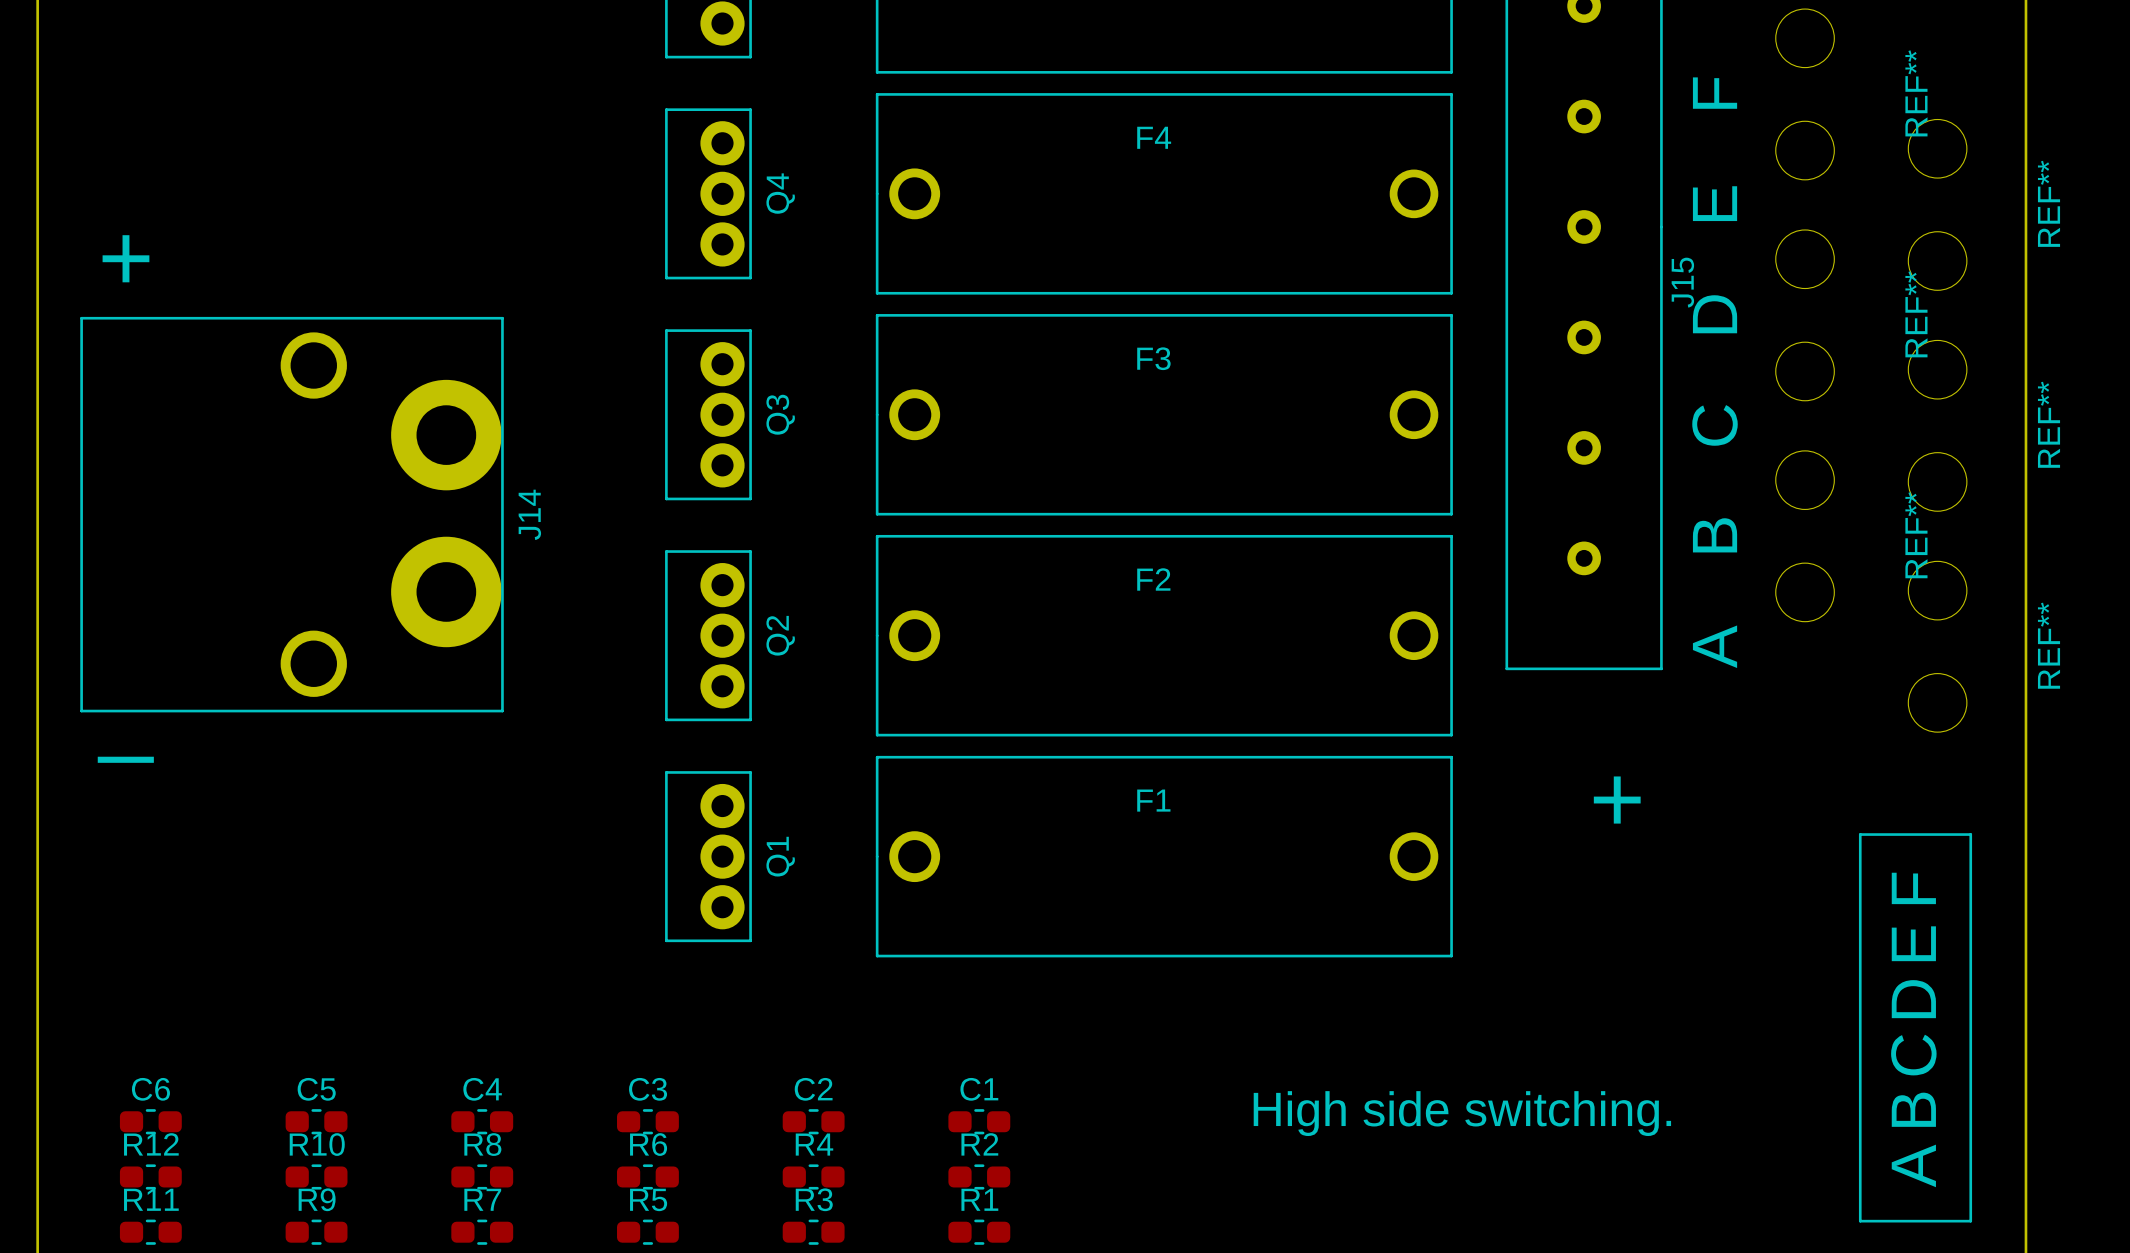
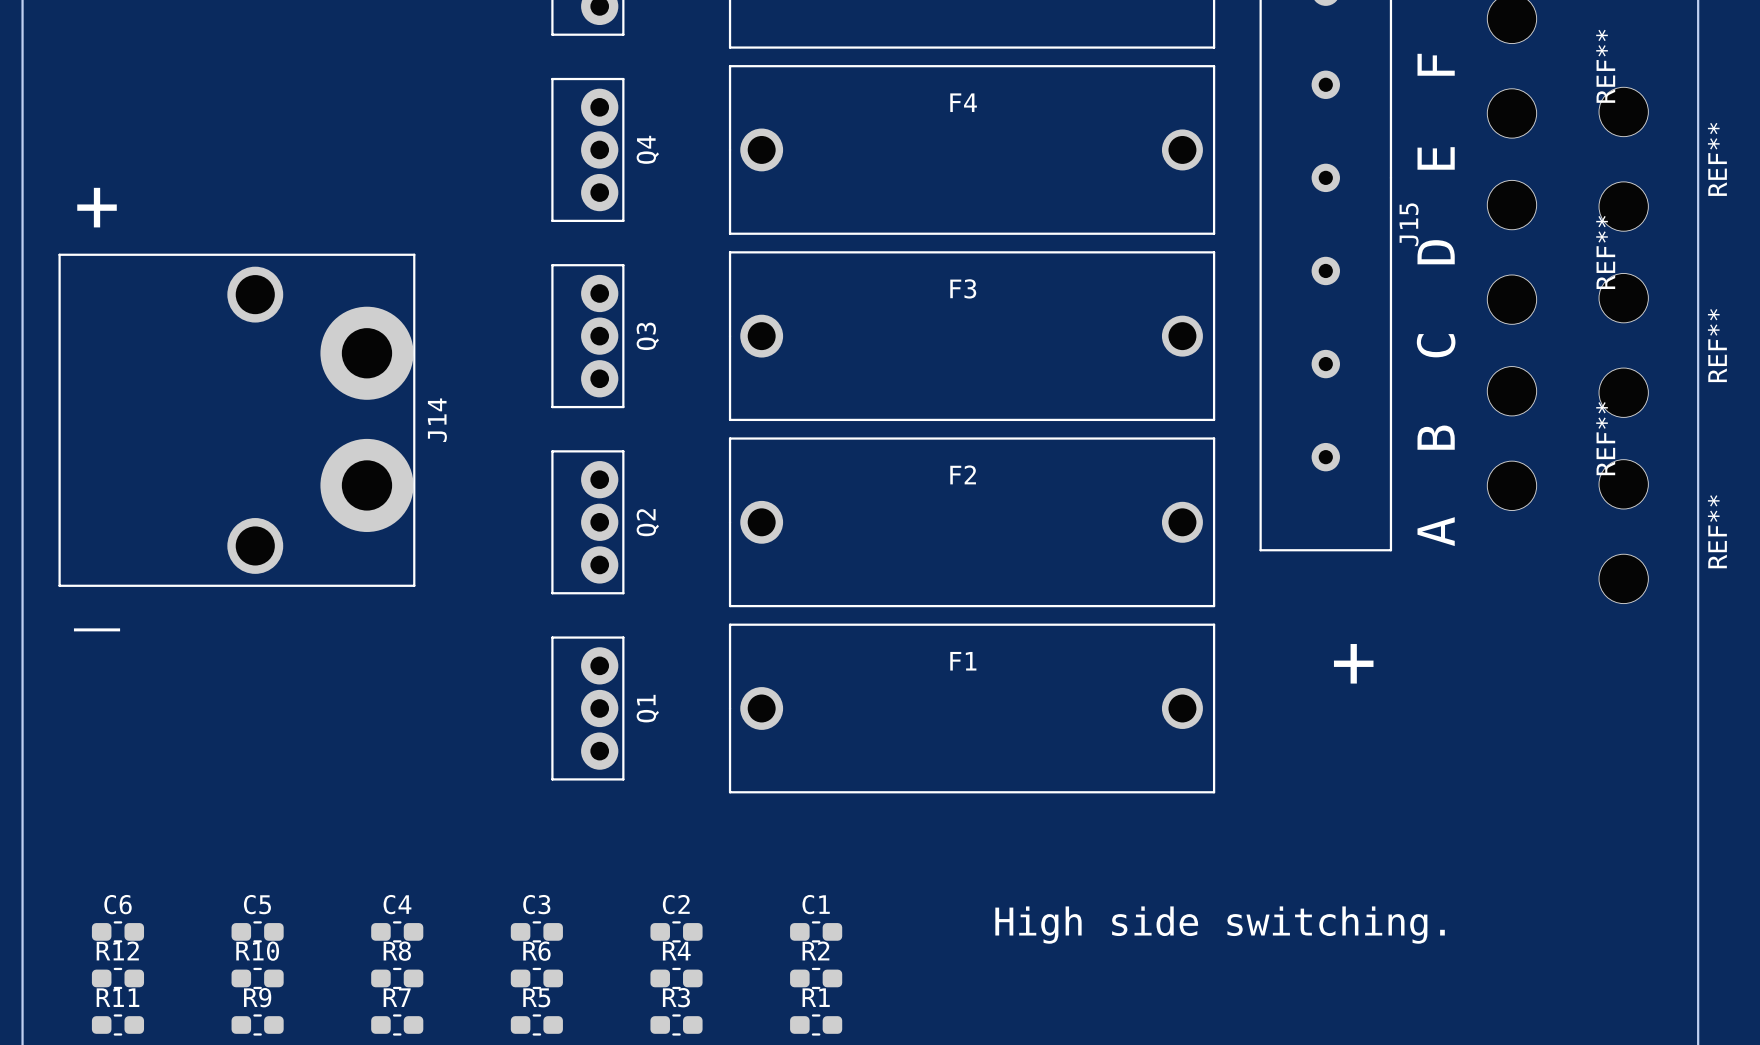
line: (1860, 834) (1970, 834) (1970, 1221) (1860, 1221) (1860, 834) -> none
text: F (1913, 888) -> none
text: E (1913, 943) -> none
text: D (1913, 999) -> none
text: C (1913, 1055) -> none
text: B (1913, 1109) -> none
text: A (1913, 1165) -> none

